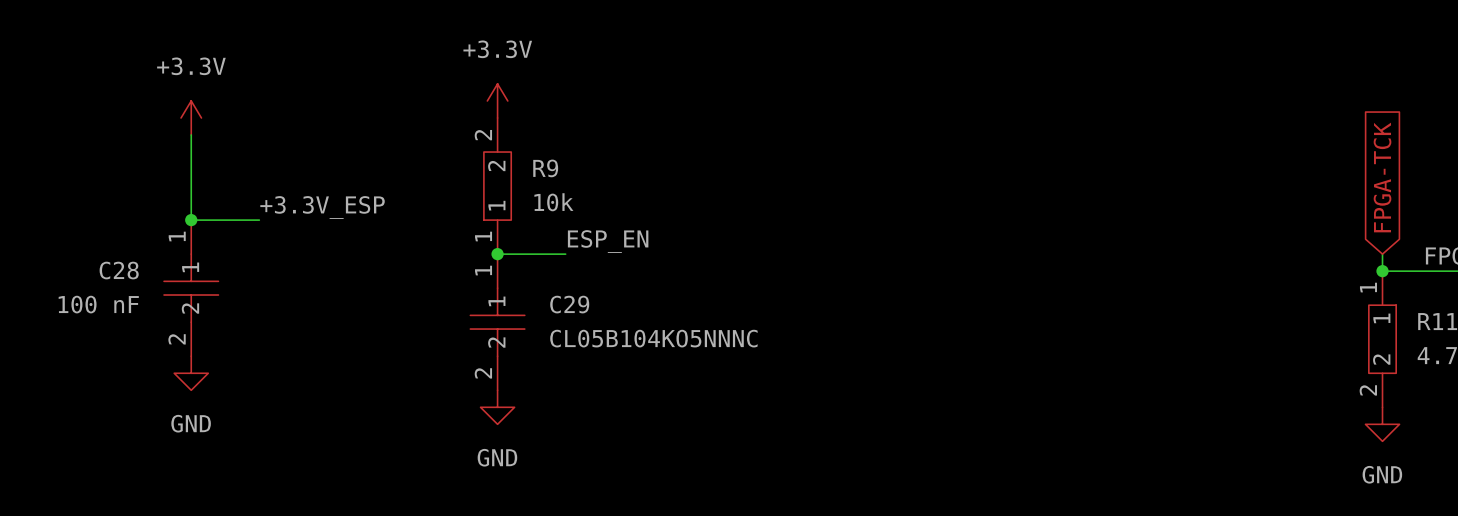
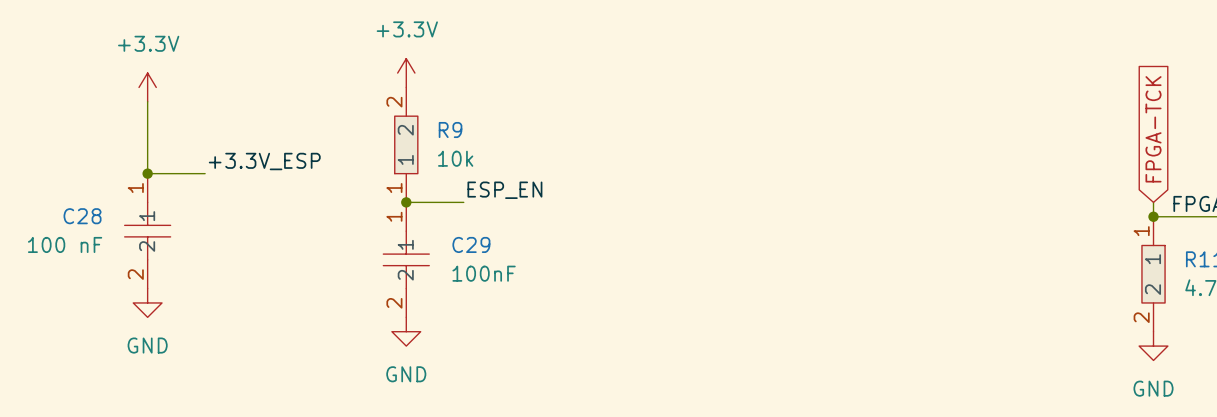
C29 value: CL05B104KO5NNNC (653, 338) -> 100nF (484, 273)

